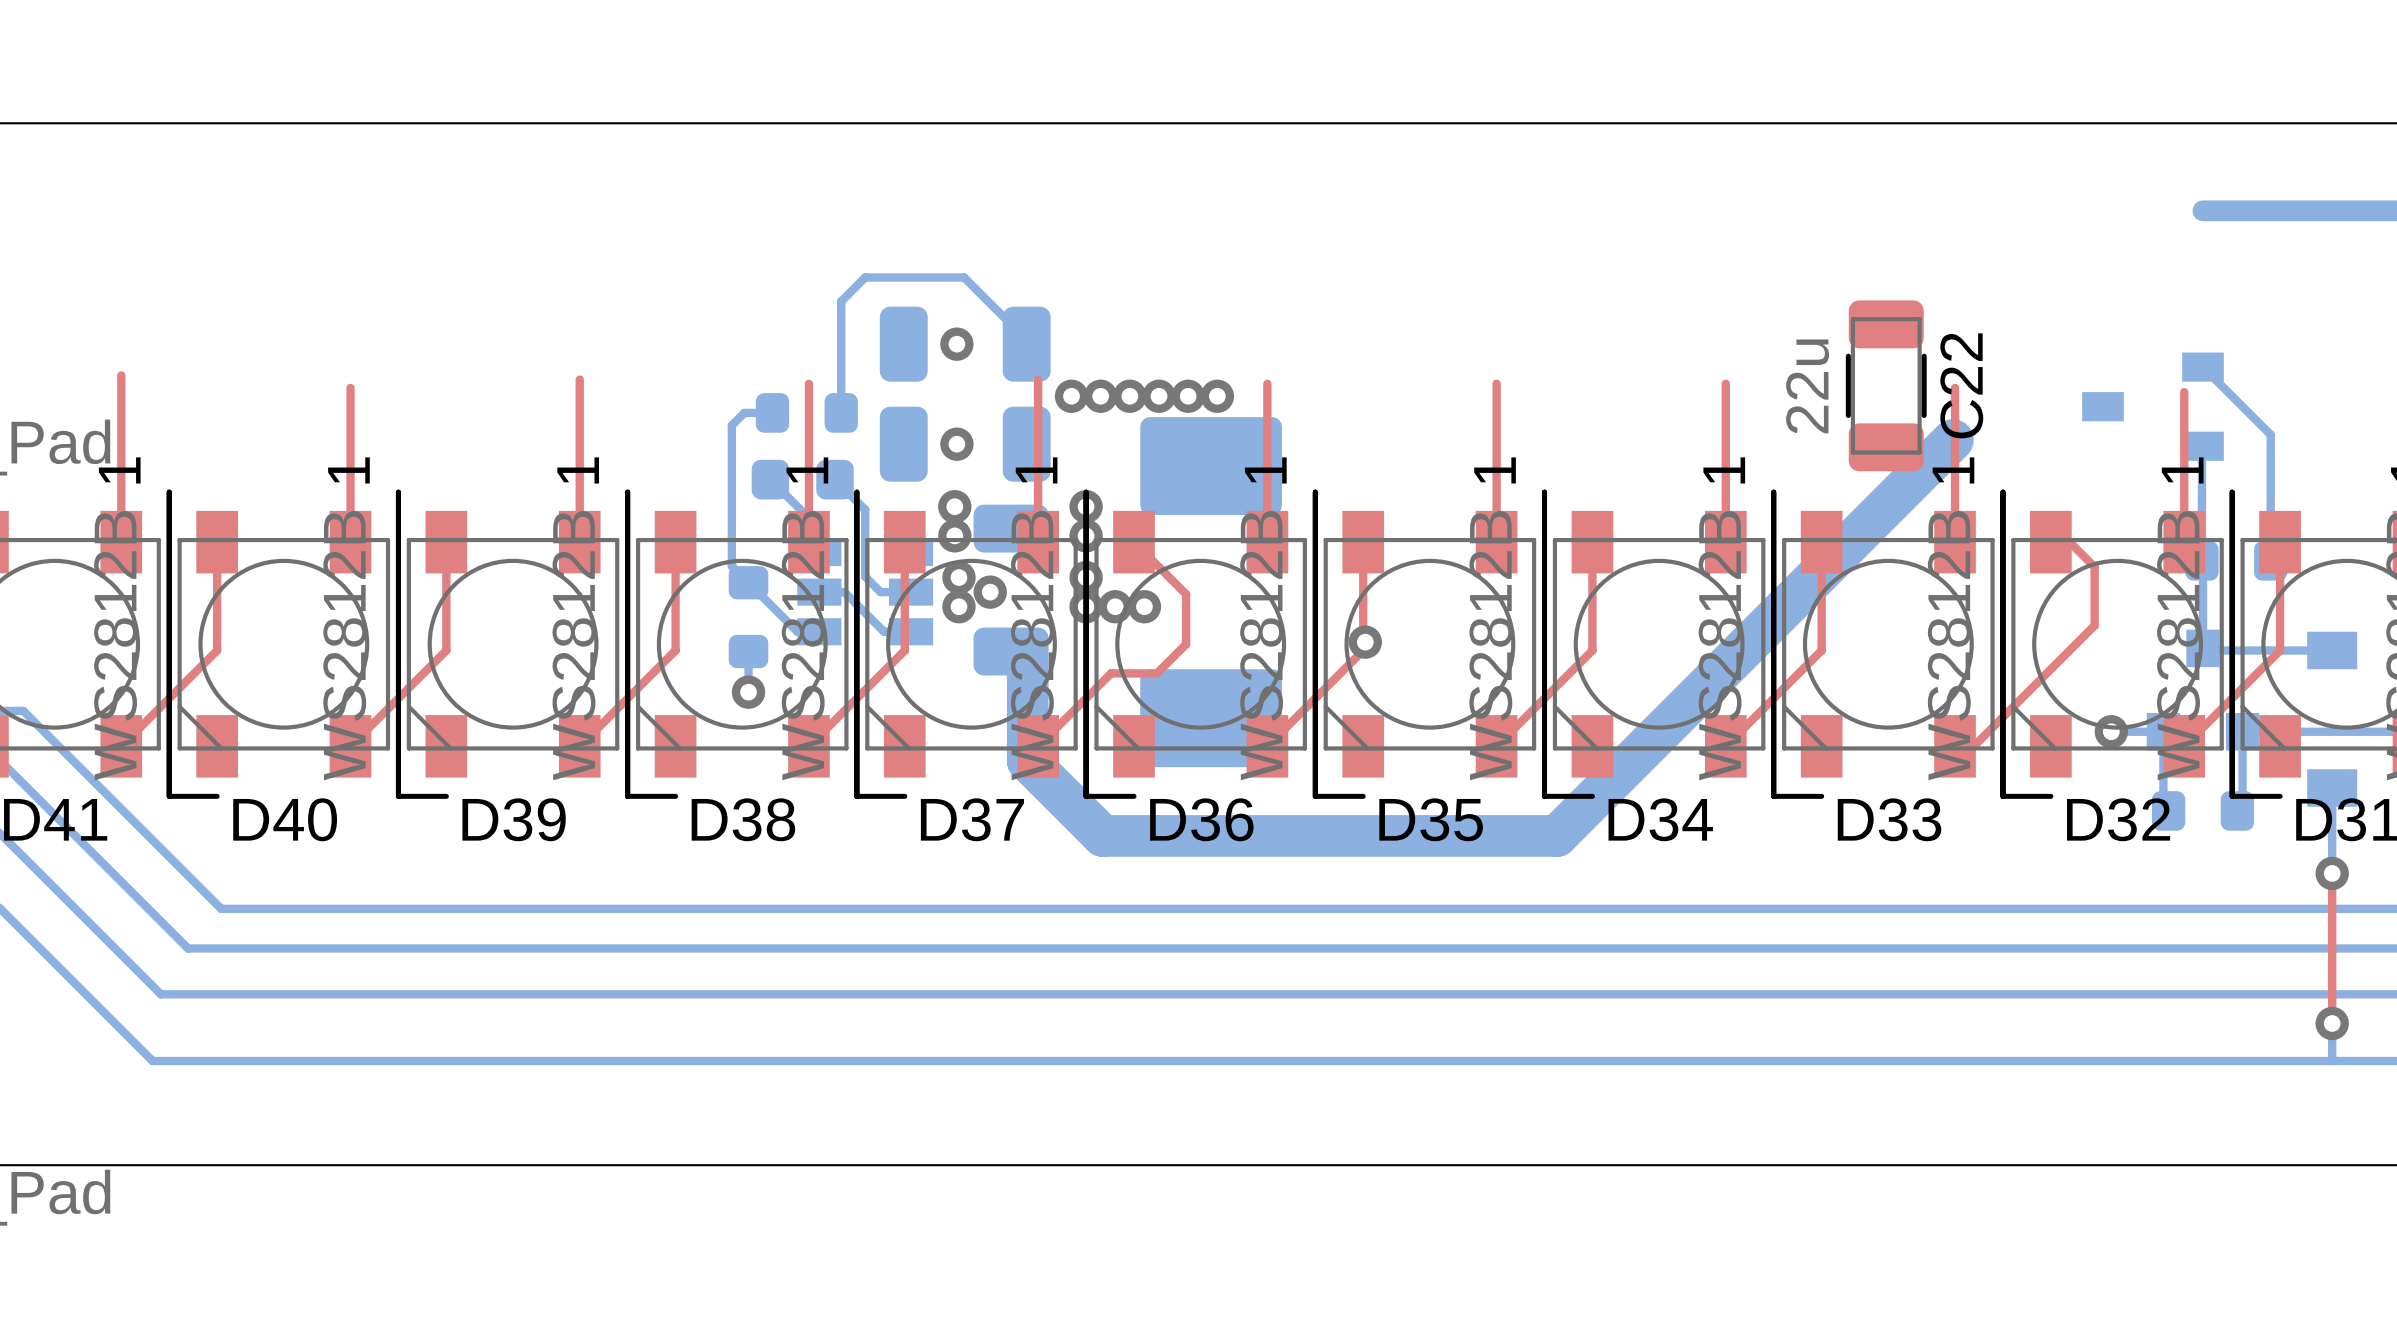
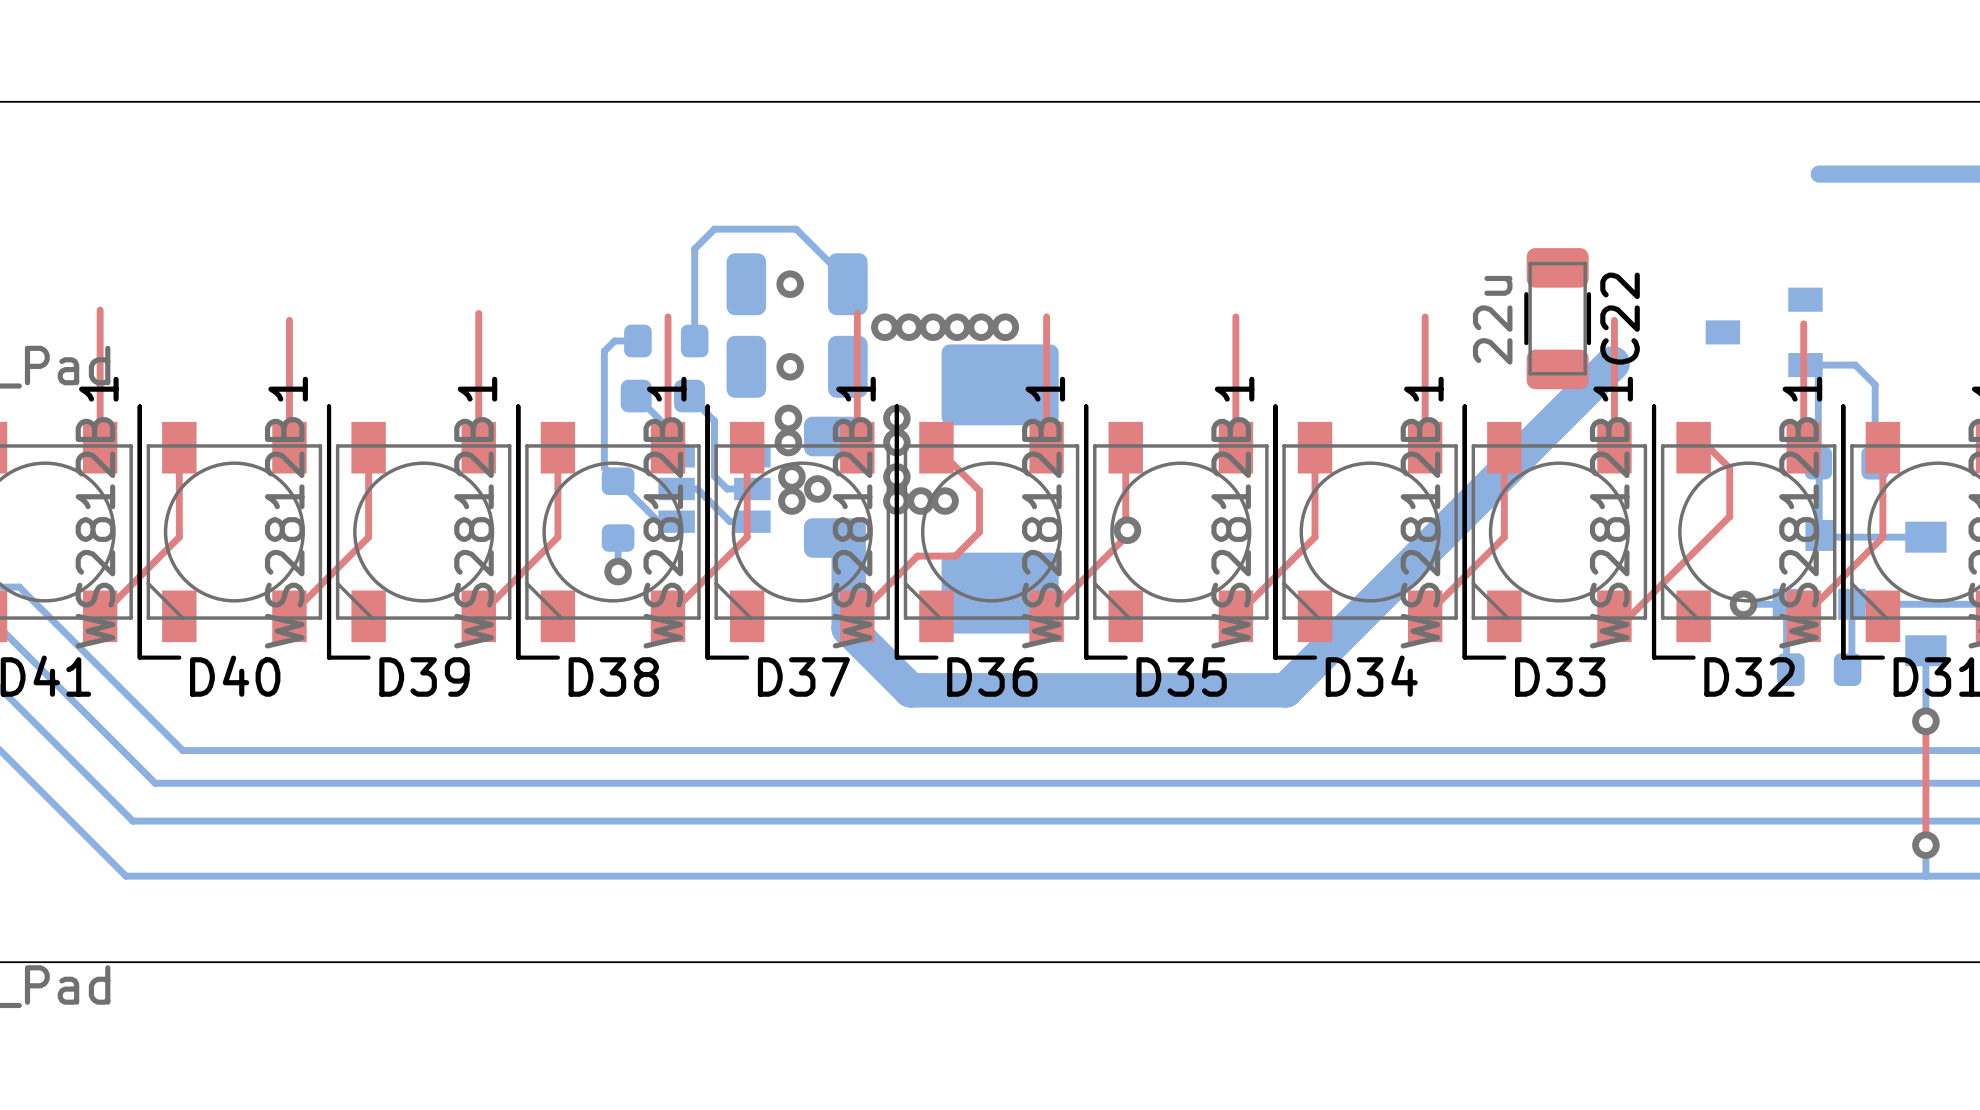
bottom track: (2203, 367) (2270, 434) (2270, 466) -> (1805, 365) (1855, 365) (1875, 384)
part position: (2152, 406) -> (1764, 332)

